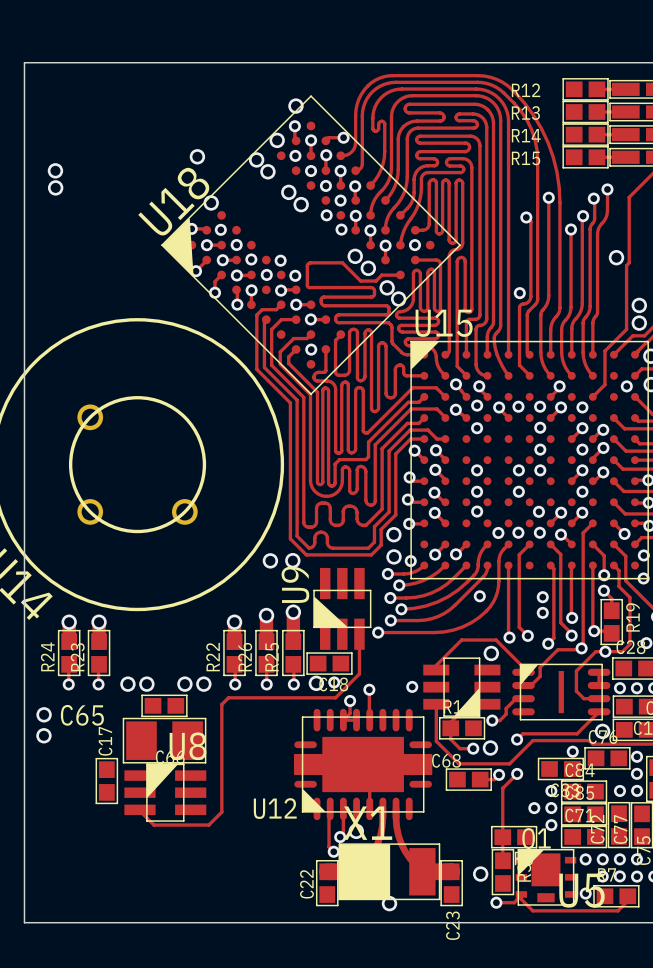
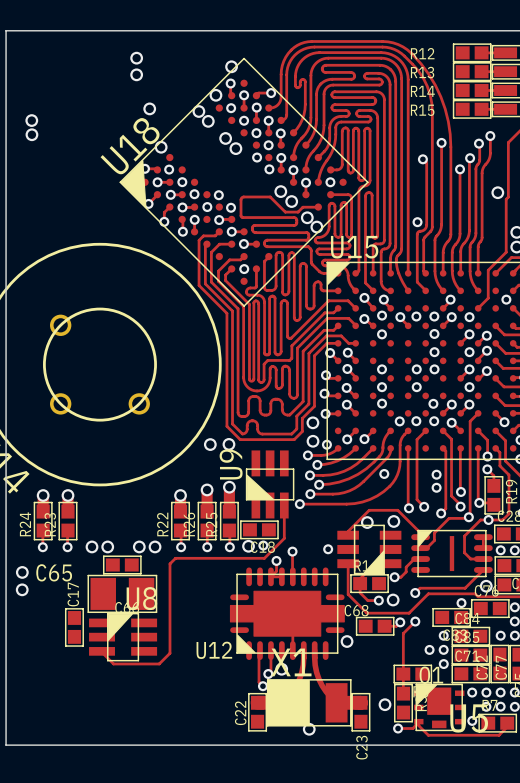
via: none -> (136, 58)
via: none -> (136, 74)
via: none -> (367, 522)
via: none -> (347, 641)

